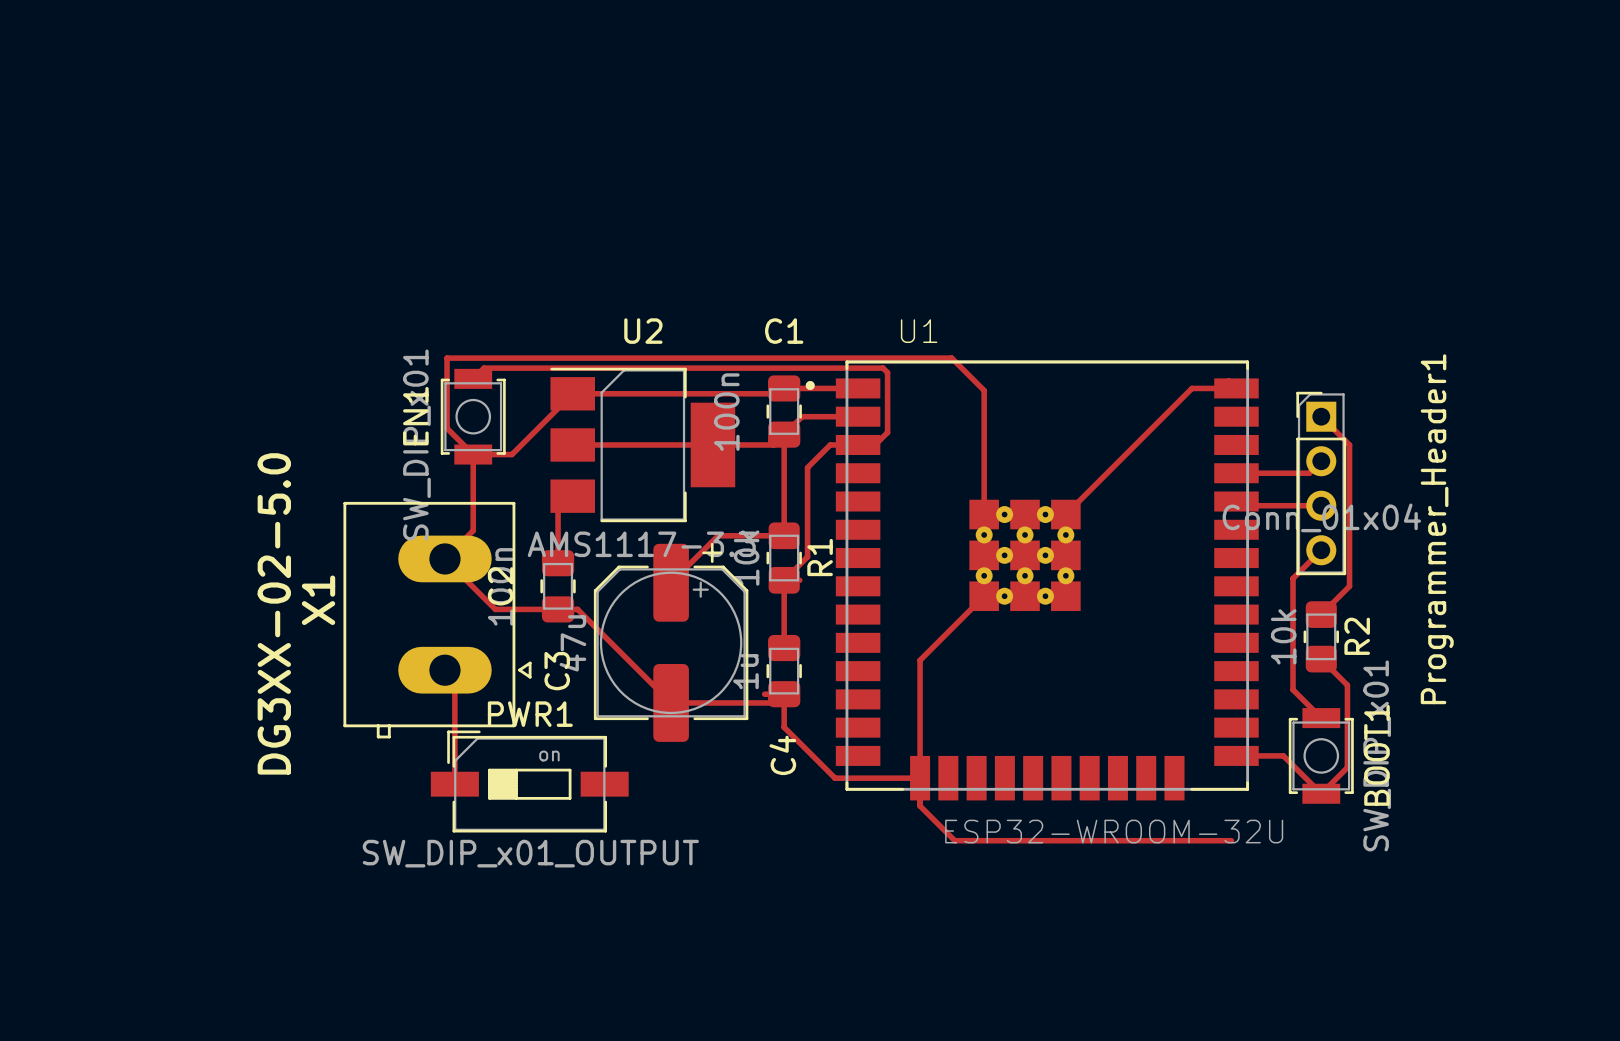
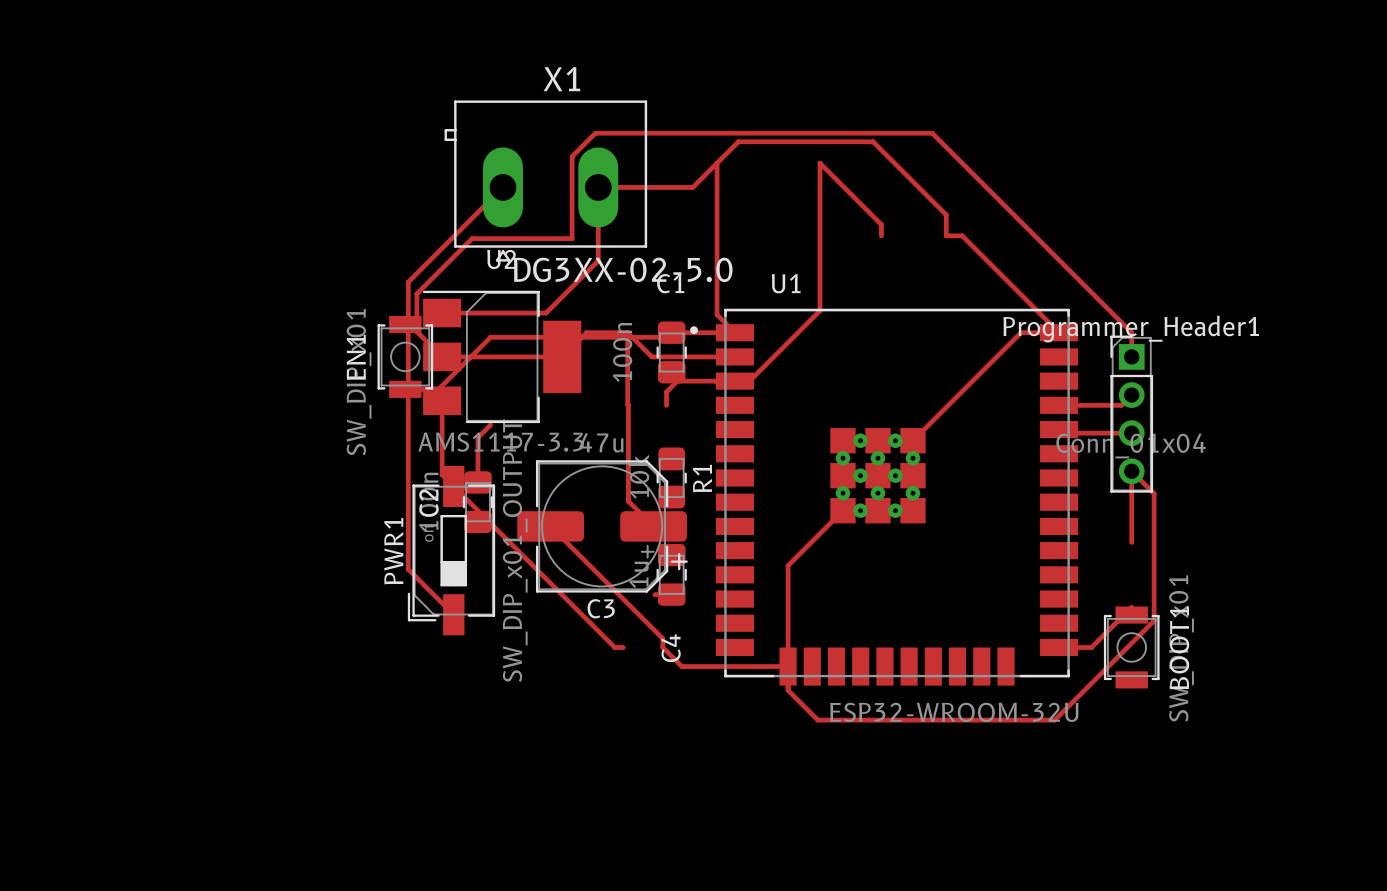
track: none -> (717, 163) (717, 314) (734, 332) (744, 332)
track: none -> (502, 187) (408, 282) (408, 569) (453, 614)
track: none -> (442, 313) (546, 313) (598, 260) (598, 187) (692, 187) (738, 141) (873, 141) (946, 214) (946, 235) (962, 235) (1052, 326)
track: (473, 378) (483, 368) (883, 368) (887, 372) (887, 432) -> (881, 235) (881, 224) (820, 163) (820, 310) (760, 370)
track: none -> (627, 332) (628, 501) (653, 526)
track: (802, 416) (773, 444) (572, 444) -> (687, 356) (651, 356) (627, 332)
track: (1321, 416) (1349, 444) (1349, 586) (1321, 614) -> (1131, 356) (1131, 332) (932, 133) (595, 133) (572, 156) (572, 238) (472, 238) (416, 293) (416, 331) (442, 356) (562, 356) (586, 332) (627, 332)
track: (784, 434) (784, 535) (718, 535) (671, 582) (656, 568) -> none
U2 position: (642, 444) -> (502, 356)
track: (830, 444) (807, 467) (807, 556) (783, 581) -> (711, 381) (677, 381) (666, 392) (666, 405)
track: none -> (442, 400) (442, 474) (614, 647) (623, 647)
track: (984, 514) (984, 390) (951, 358) (447, 358) (447, 428) (473, 454) (473, 530) (444, 558) (495, 609) (577, 609) (671, 702) (775, 702) (784, 694) (784, 727) (835, 778) -> (550, 526) (662, 638) (662, 647) (681, 666) (715, 666)
Programmer_Header1 name rotation: 0° (1437, 529) -> 90° clockwise (1131, 329)
track: (1321, 550) (1293, 578) (1293, 689) (1321, 718) -> none
track: (799, 580) (784, 580) (784, 648) -> none
X1 value position: DG3XX-02-5.0 (274, 613) -> DG3XX-02-5.0 (623, 269)
X1 rotation: 0° (437, 620) -> 90° clockwise (545, 181)
X1 position: (437, 620) -> (545, 181)
R2: 10k (1321, 636) -> none
C3 rotation: 0° (671, 642) -> 90° clockwise (602, 526)
track: (1321, 659) (1347, 685) -> (1131, 542) (1131, 471) (1154, 493) (1154, 586)
track: (444, 670) (454, 680) (454, 784) -> none
C3 name position: C3 (557, 671) -> C3 (601, 608)
track: (1347, 724) (1347, 767) (1321, 793) (1283, 755) (1274, 755) -> (1131, 607) (1091, 647)
track: none -> (1154, 620) (1054, 720)
PWR1 rotation: 0° (529, 781) -> 90° counterclockwise (451, 550)
PWR1 position: (529, 781) -> (451, 550)

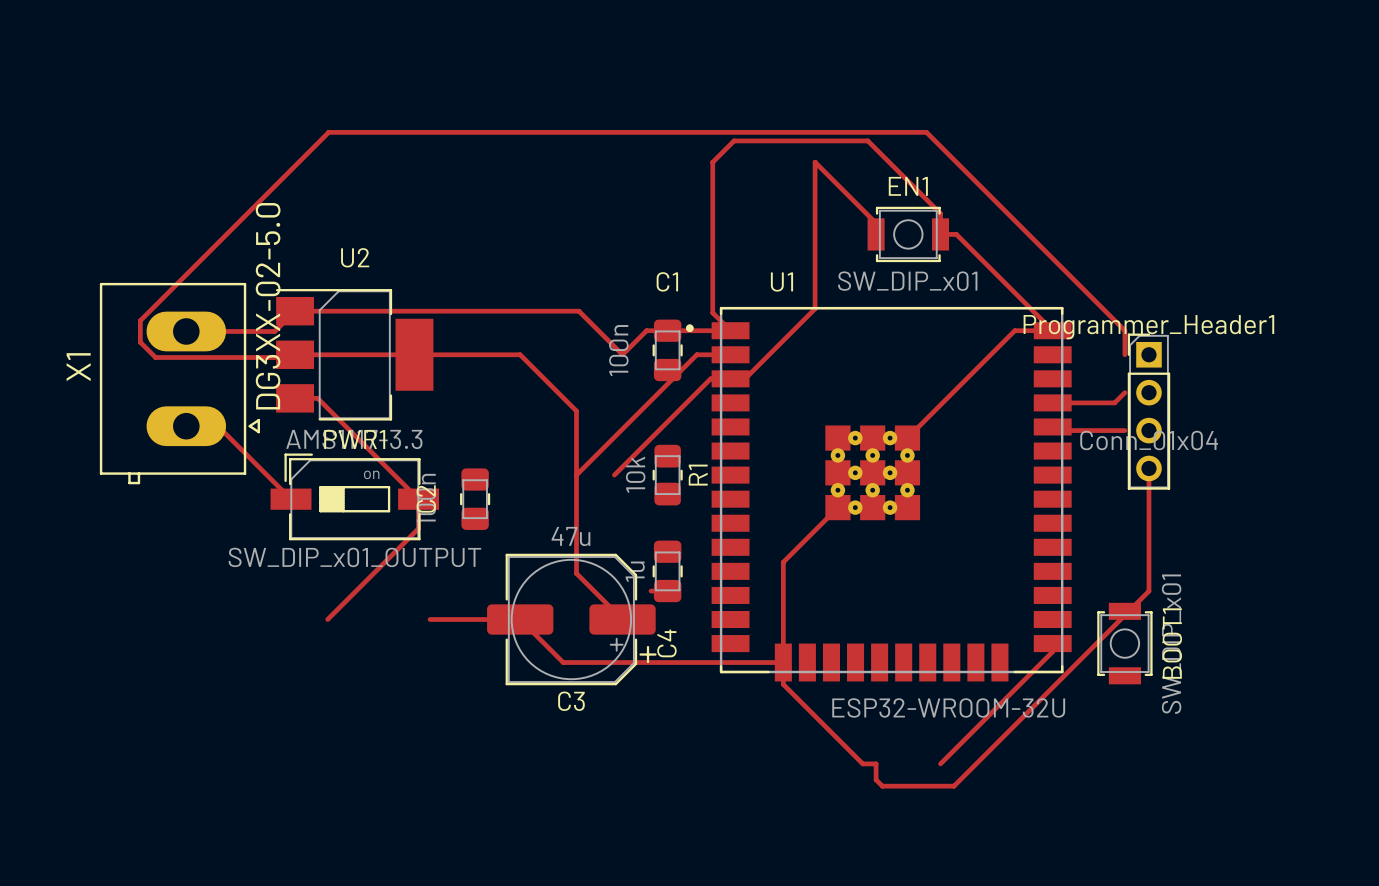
track: (595, 133) (572, 156) (572, 238) (472, 238) (416, 293) (416, 331) (442, 356) -> (591, 132) (328, 132) (140, 320) (140, 342) (155, 357) (439, 354)
track: (717, 163) (692, 187) (598, 187) (598, 260) (546, 313) -> none
X1 rotation: 0° (545, 181) -> 90° counterclockwise (179, 383)
X1 position: (545, 181) -> (179, 383)
track: (502, 187) (408, 282) (408, 569) (453, 614) -> none
track: none -> (439, 311) (295, 311) (274, 331) (186, 331)
track: (627, 332) (651, 356) (701, 356) -> (576, 475) (696, 354)
track: (627, 332) (586, 332) (562, 356) (523, 356) -> (622, 619) (576, 573) (576, 411) (520, 354)
track: (627, 332) (628, 501) (653, 526) -> none
track: (671, 332) (667, 337) (490, 337) (438, 389) (405, 389) -> (667, 330) (646, 330) (622, 354) (578, 311) (542, 311)
EN1 rotation: 0° (405, 356) -> 90° clockwise (908, 234)
EN1 position: (405, 356) -> (908, 234)
U2 position: (502, 356) -> (354, 354)
track: (714, 381) (677, 381) (666, 392) (666, 405) -> (710, 378) (614, 475)
EN1 value position: SW_DIP_x01 (359, 382) -> SW_DIP_x01 (907, 281)
track: none -> (295, 398) (317, 398) (418, 499) (418, 528) (327, 619)
track: (442, 400) (442, 474) (614, 647) (623, 647) -> none
Programmer_Header1 position: (1131, 414) -> (1148, 411)
track: (490, 424) (477, 437) (477, 482) (486, 490) -> none
track: none -> (186, 426) (218, 426) (291, 499)
track: (550, 526) (662, 638) (662, 647) (681, 666) -> (430, 619) (520, 619) (563, 662) (677, 662)
C3 position: (602, 526) -> (571, 619)
track: (1131, 542) (1131, 471) (1154, 493) (1154, 620) (1054, 720) (817, 720) (788, 688) -> (1148, 468) (1148, 591) (953, 786) (882, 786) (876, 779) (876, 763) (862, 763) (783, 684)
PWR1 rotation: 0° (451, 550) -> 90° clockwise (354, 496)
PWR1 position: (451, 550) -> (354, 496)
track: (1131, 607) (1091, 647) (1044, 647) -> none
track: none -> (1052, 643) (1052, 651) (940, 763)

